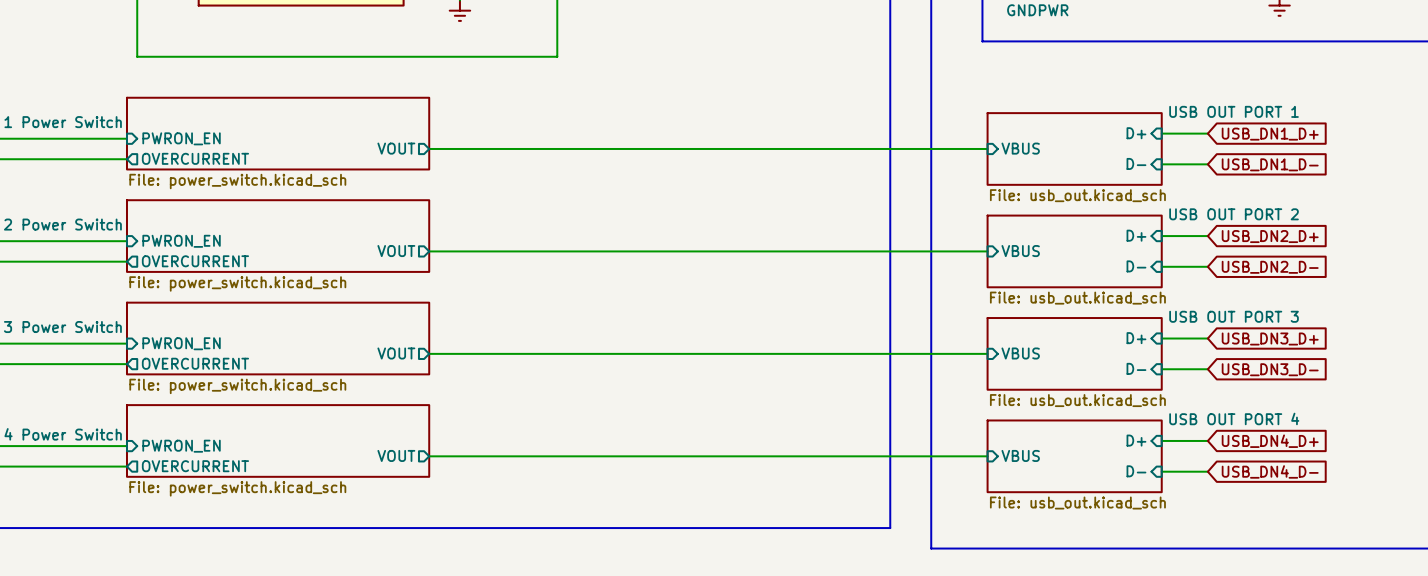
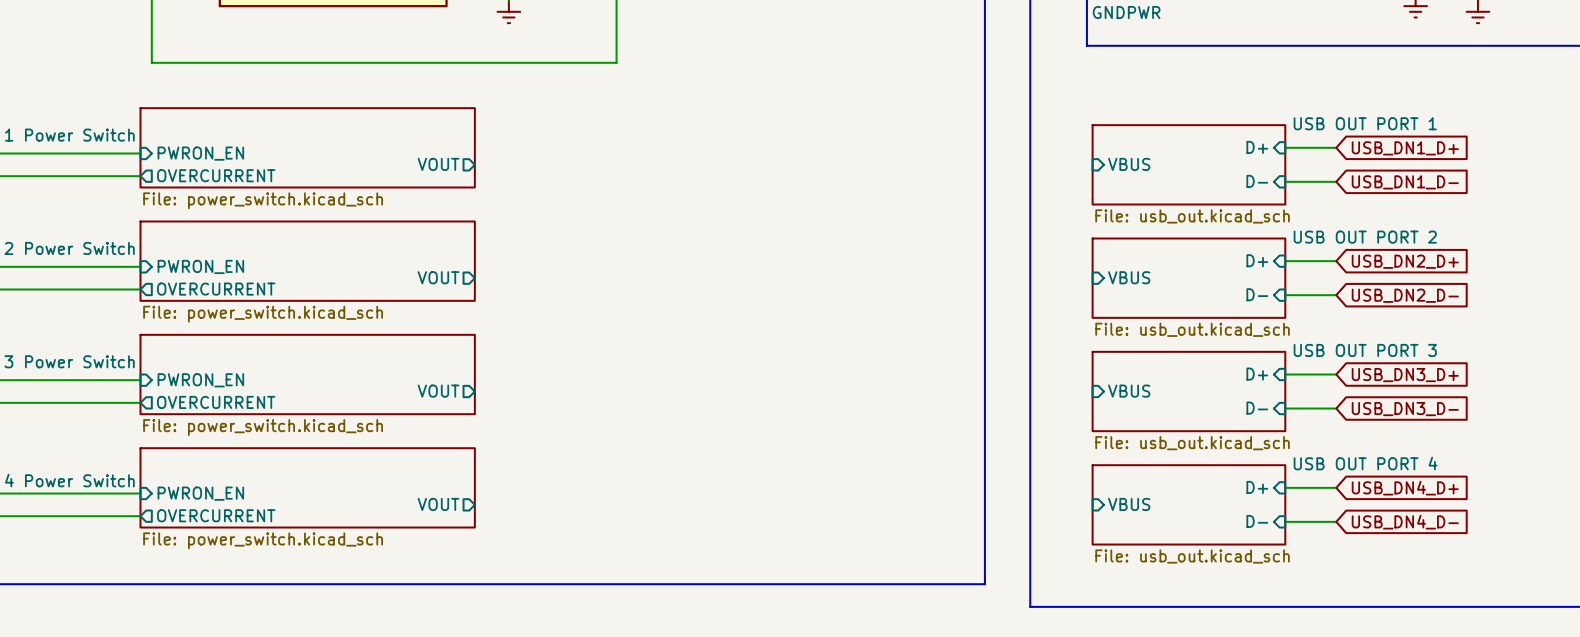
power symbol text position: GNDPWR (1037, 10) -> GNDPWR (1126, 12)
power symbol: none -> (1477, 11)
wire: (429, 148) (987, 148) -> none
wire: (429, 251) (987, 251) -> none
wire: (429, 353) (987, 353) -> none
wire: (429, 456) (987, 456) -> none

